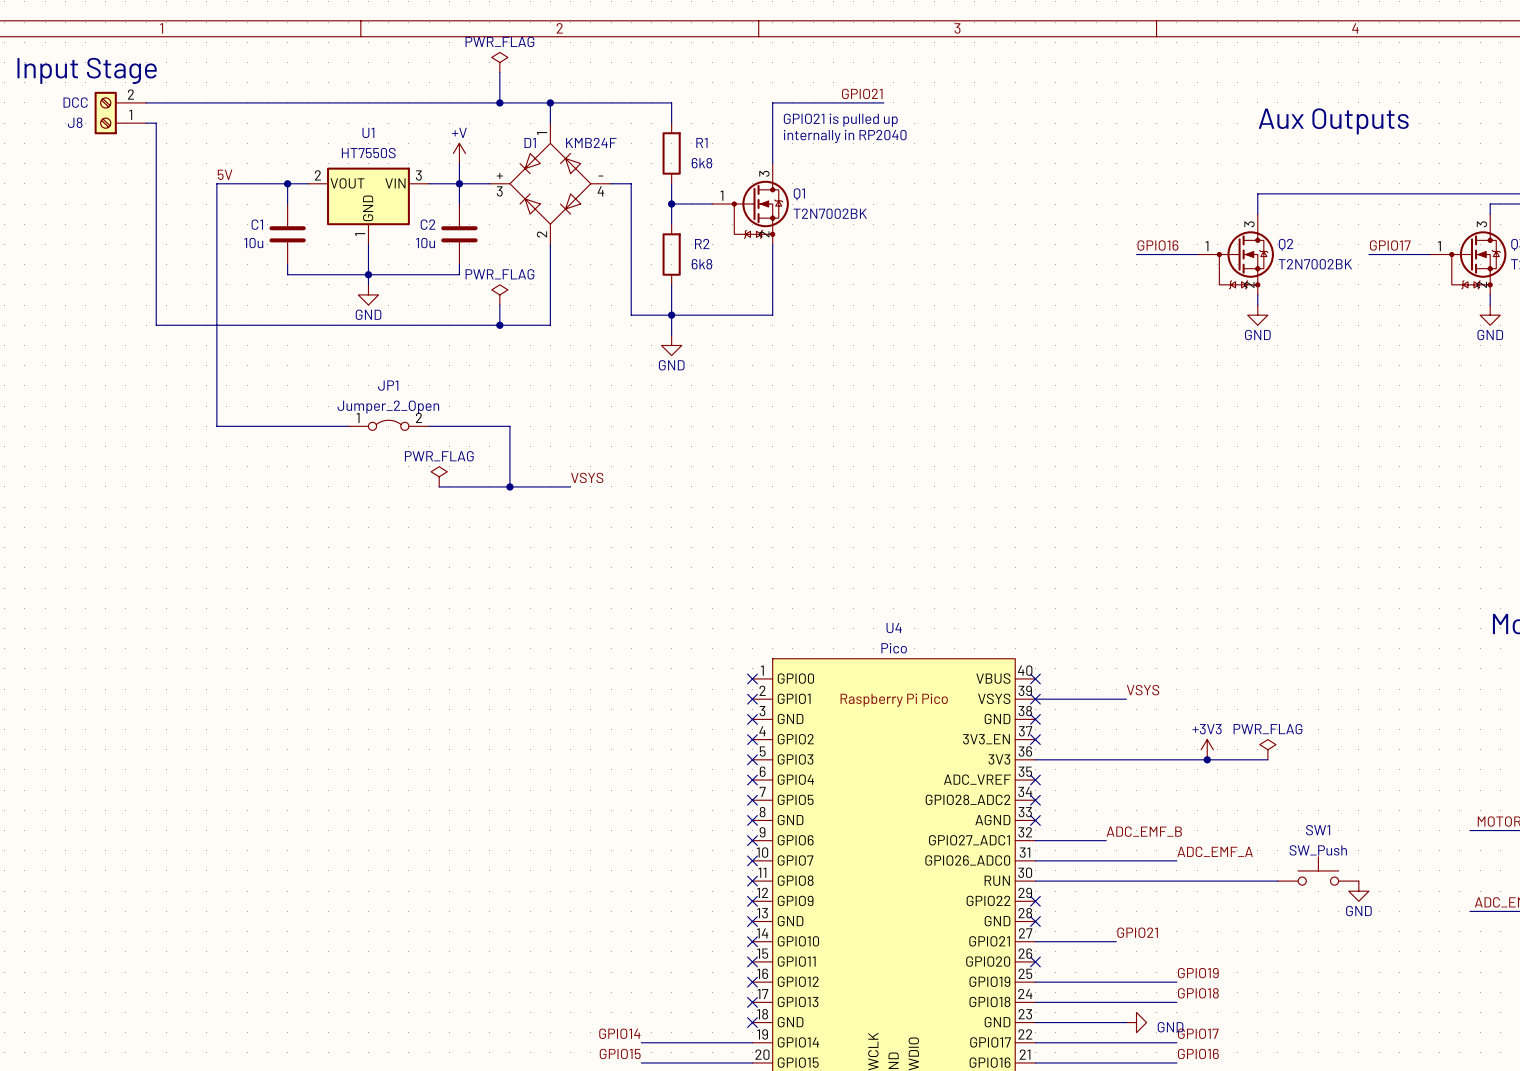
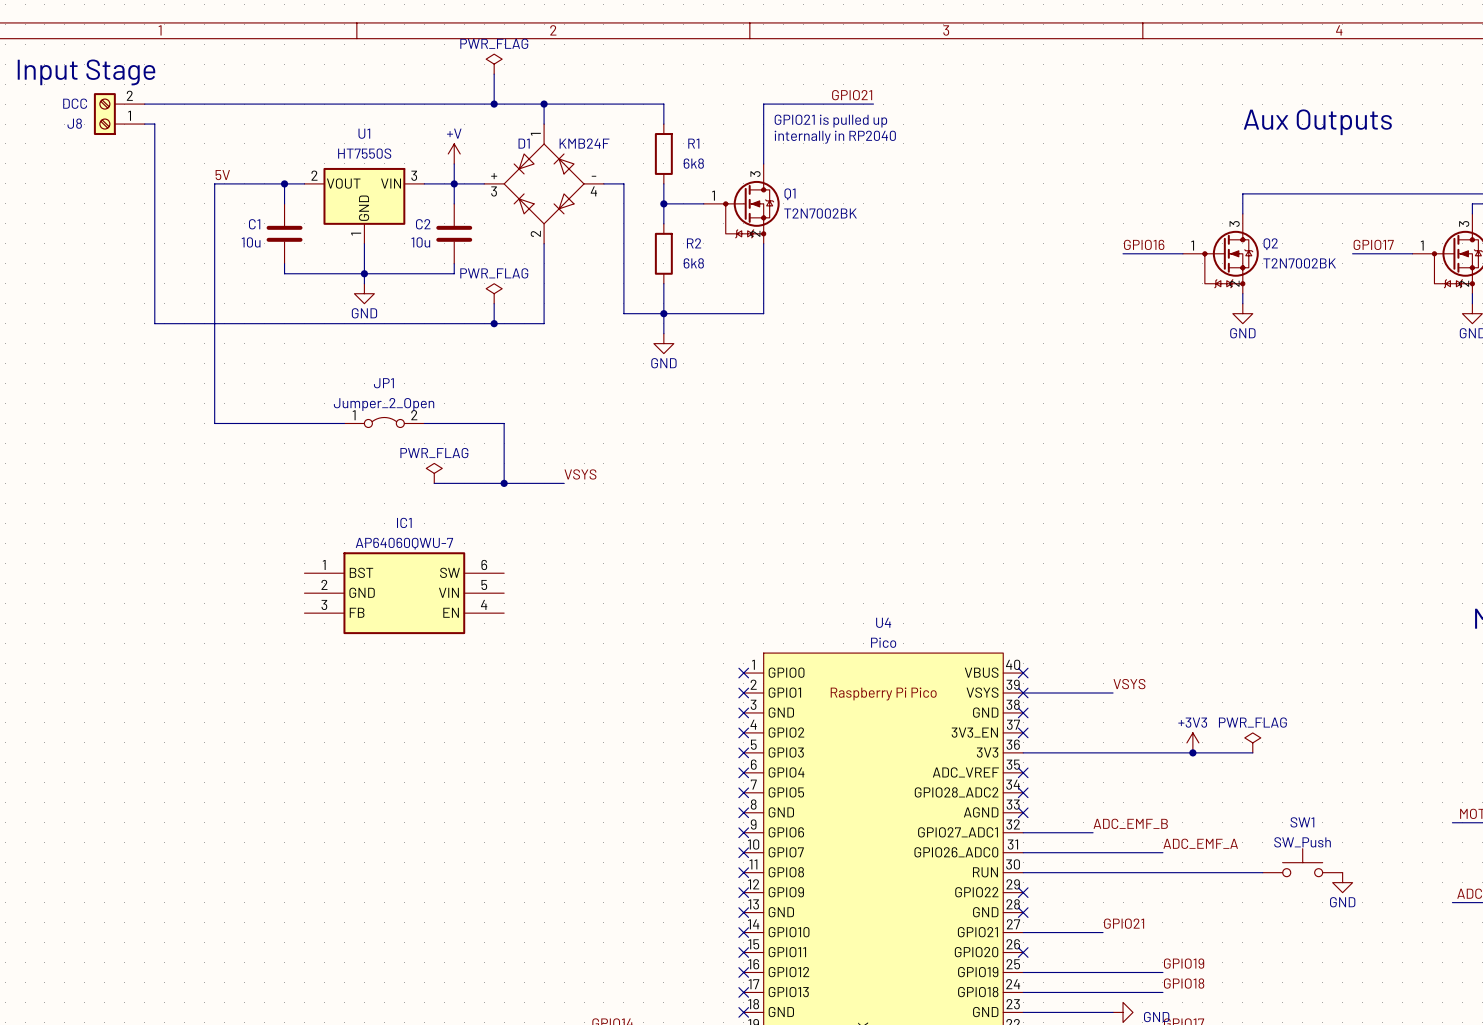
IC1: none -> AP64060QWU-7 (404, 593)

